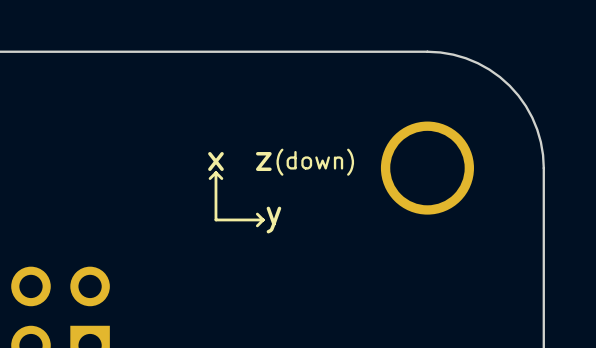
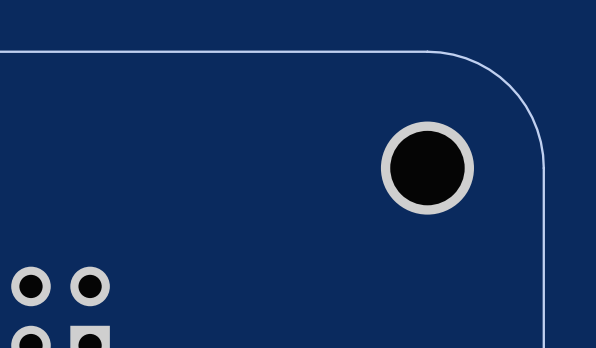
text: x (215, 161) -> none
text: z (263, 161) -> none
text: (down) (315, 162) -> none
line: (215, 172) (221, 178) -> none
line: (215, 172) (210, 178) -> none
line: (215, 172) (215, 219) (263, 219) -> none
line: (257, 214) (263, 219) -> none
line: (263, 219) (257, 225) -> none
text: y (273, 220) -> none

